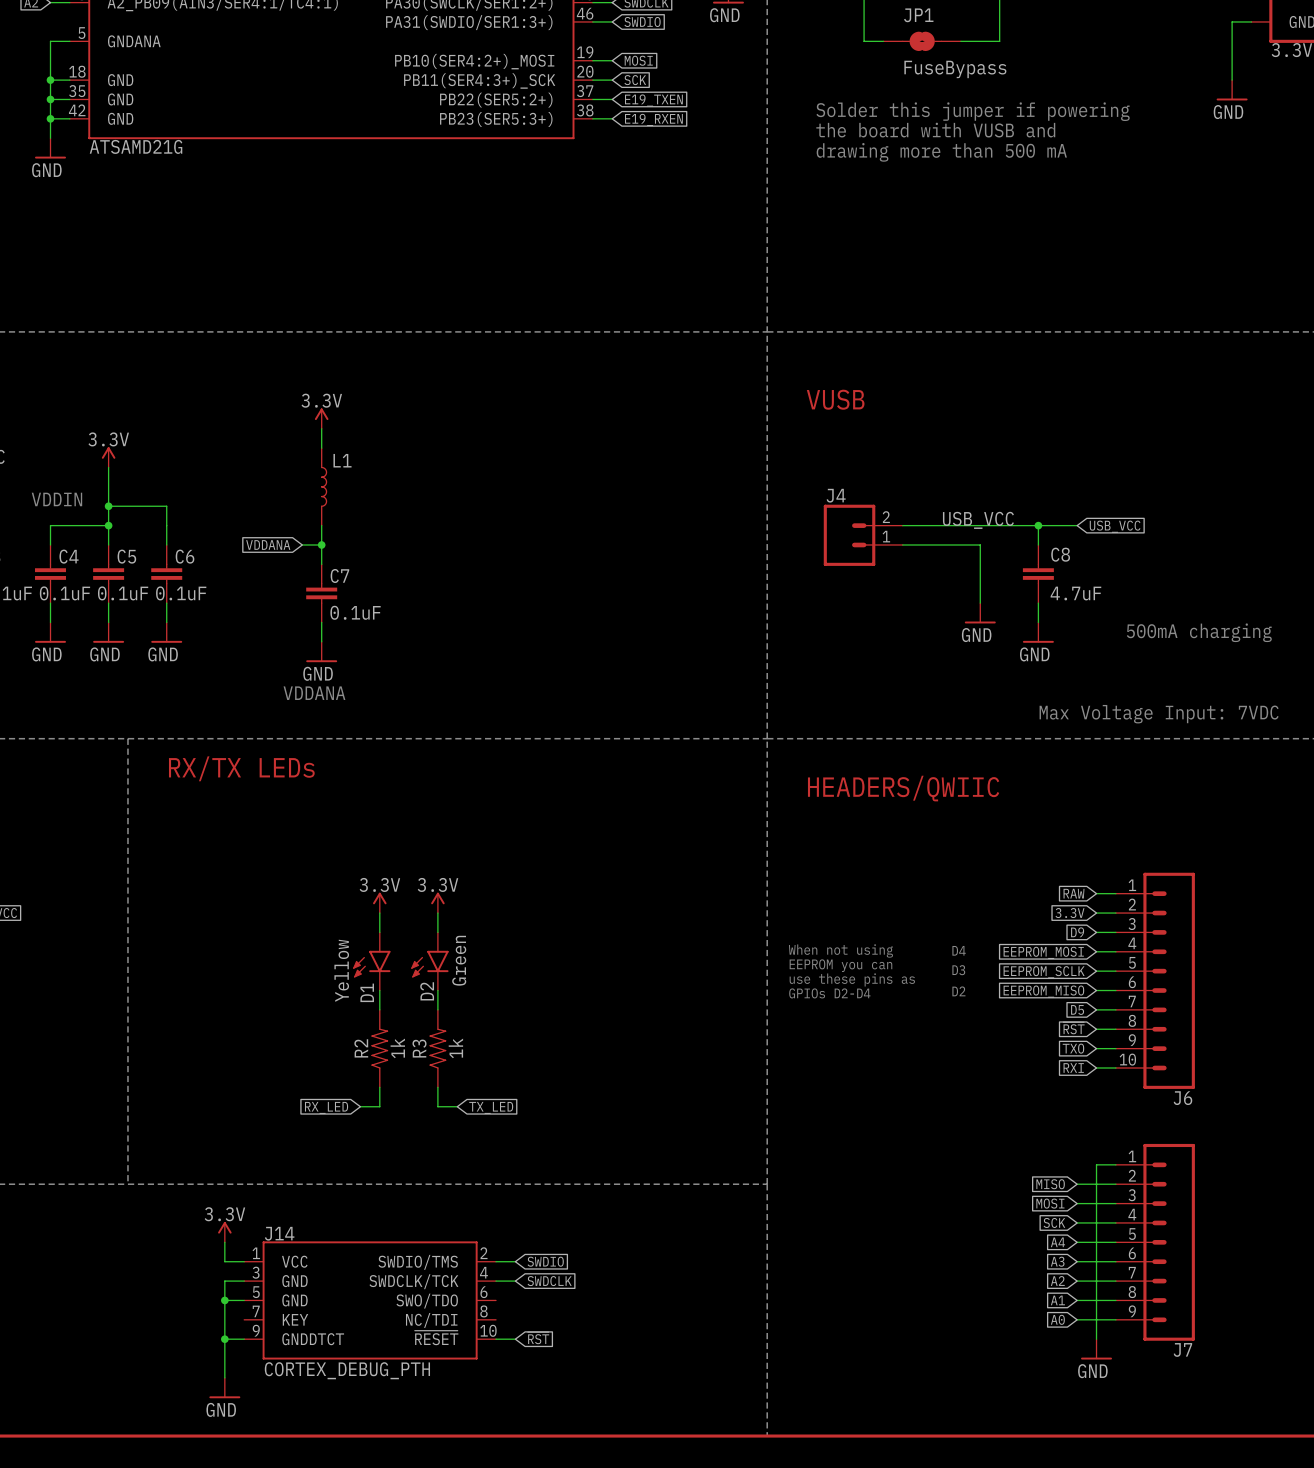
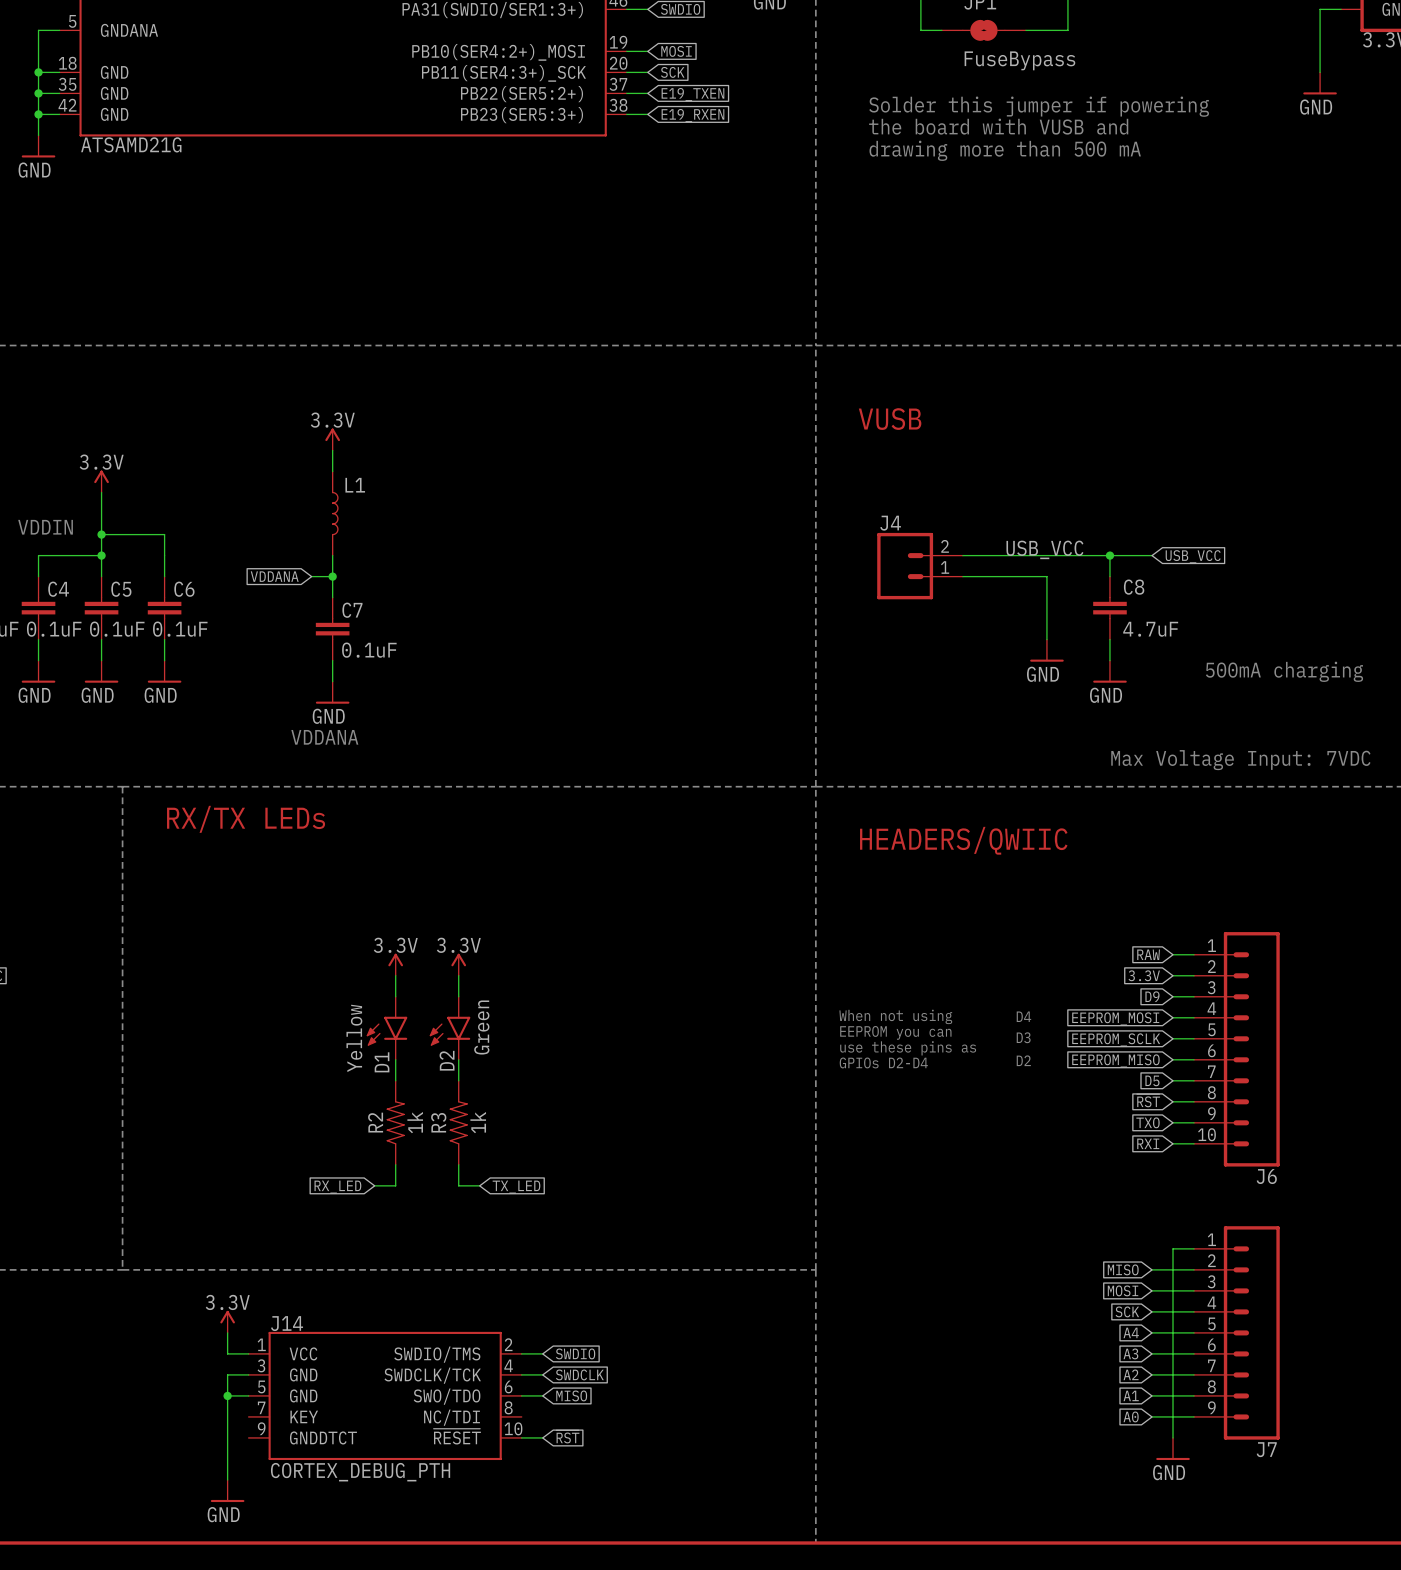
wire: none -> (521, 1395) (542, 1395)
global label: none -> MISO (571, 1395)
wire: (224, 1339) (244, 1339) -> none
junction: (224, 1339) -> none

